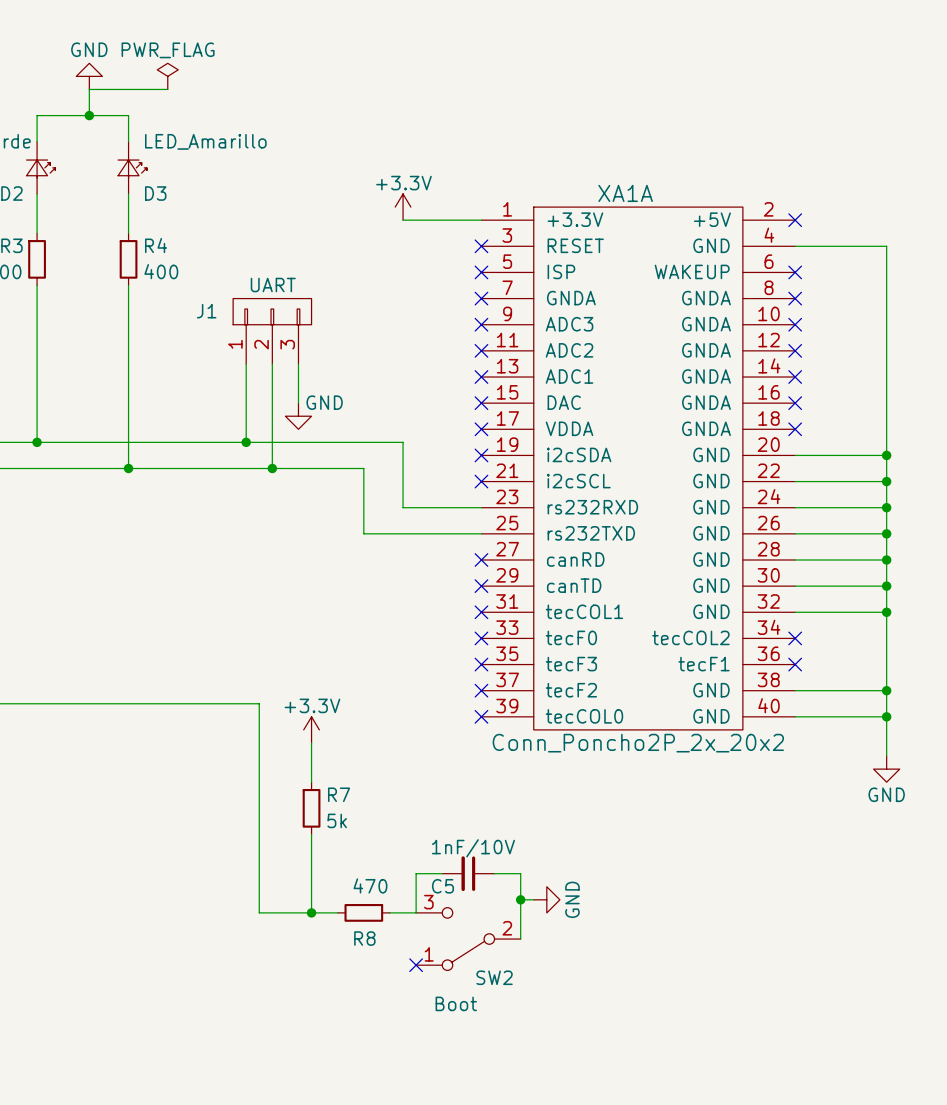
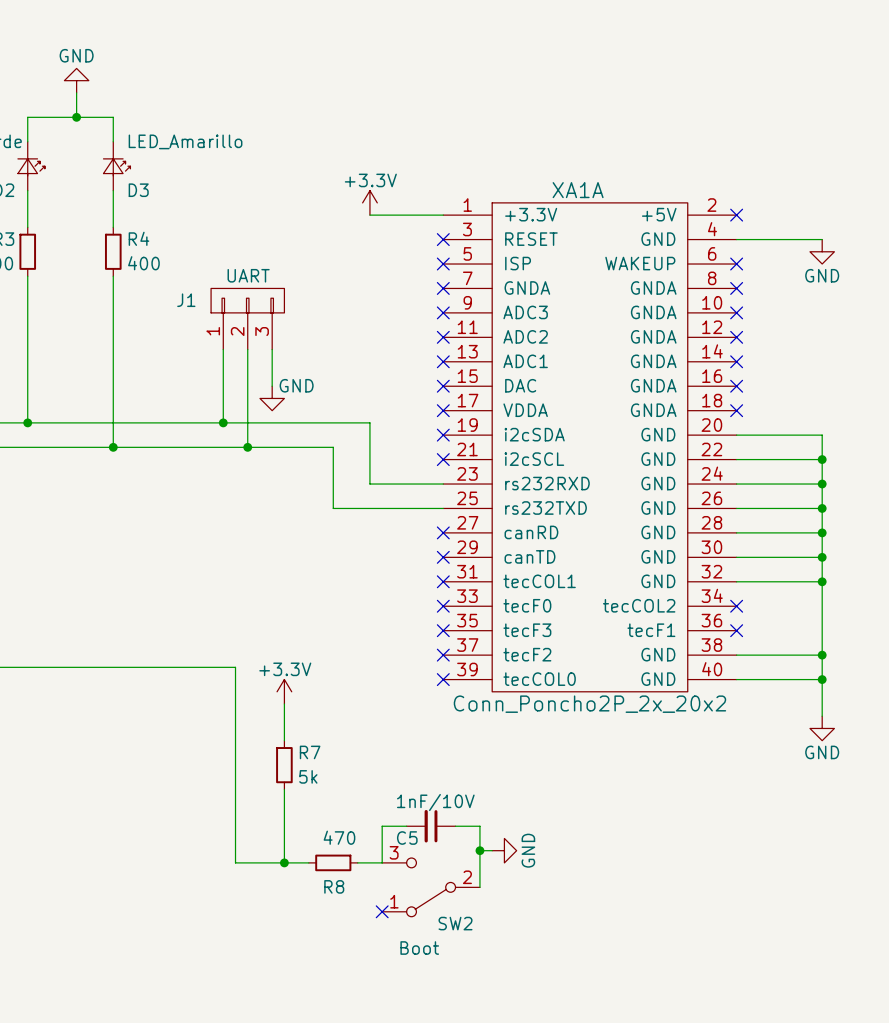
power symbol: PWR_FLAG (167, 76) -> none
wire: (89, 89) (167, 89) -> none
wire: (886, 246) (886, 455) -> none
power symbol: none -> GND (822, 251)
junction: (886, 455) -> none

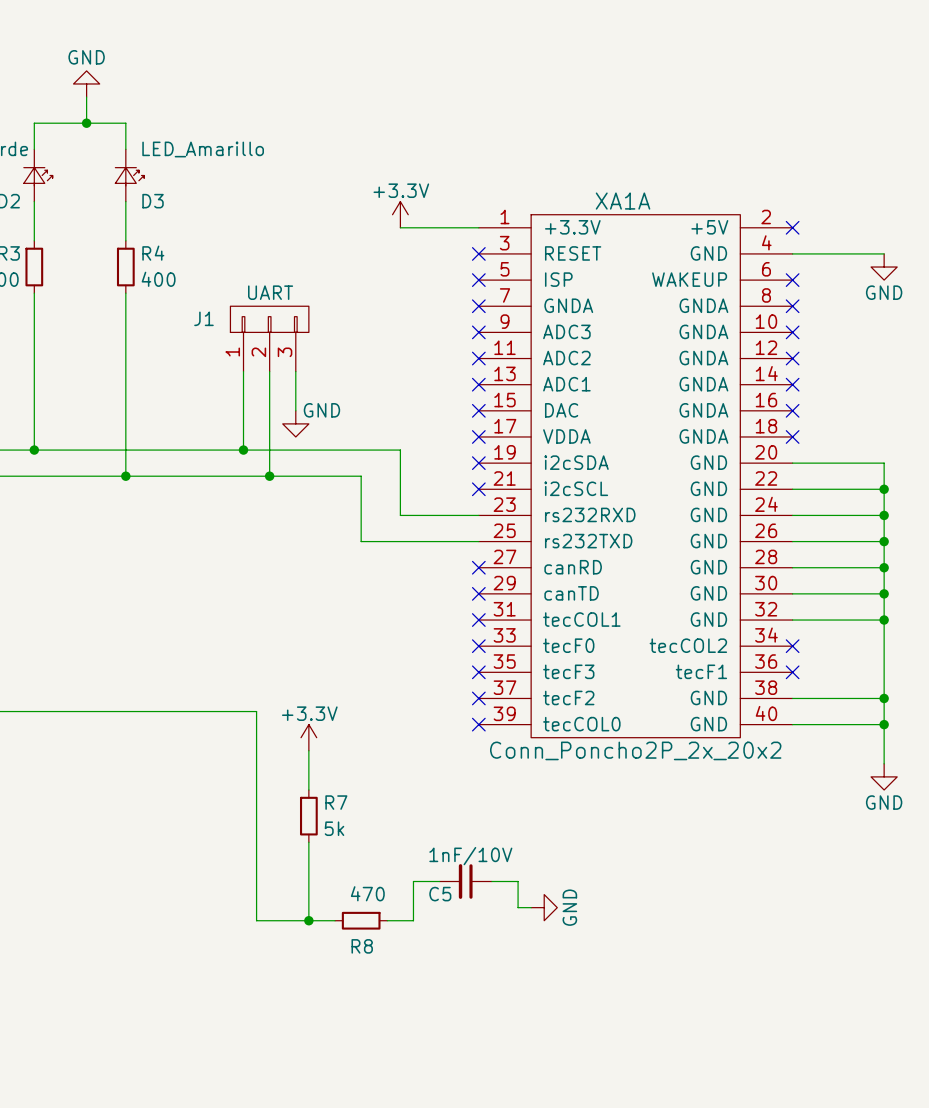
wire: (479, 850) (479, 887) -> none
junction: (479, 850) -> none
SW2: Boot (431, 887) -> none
no-connect mark: (382, 911) -> none

